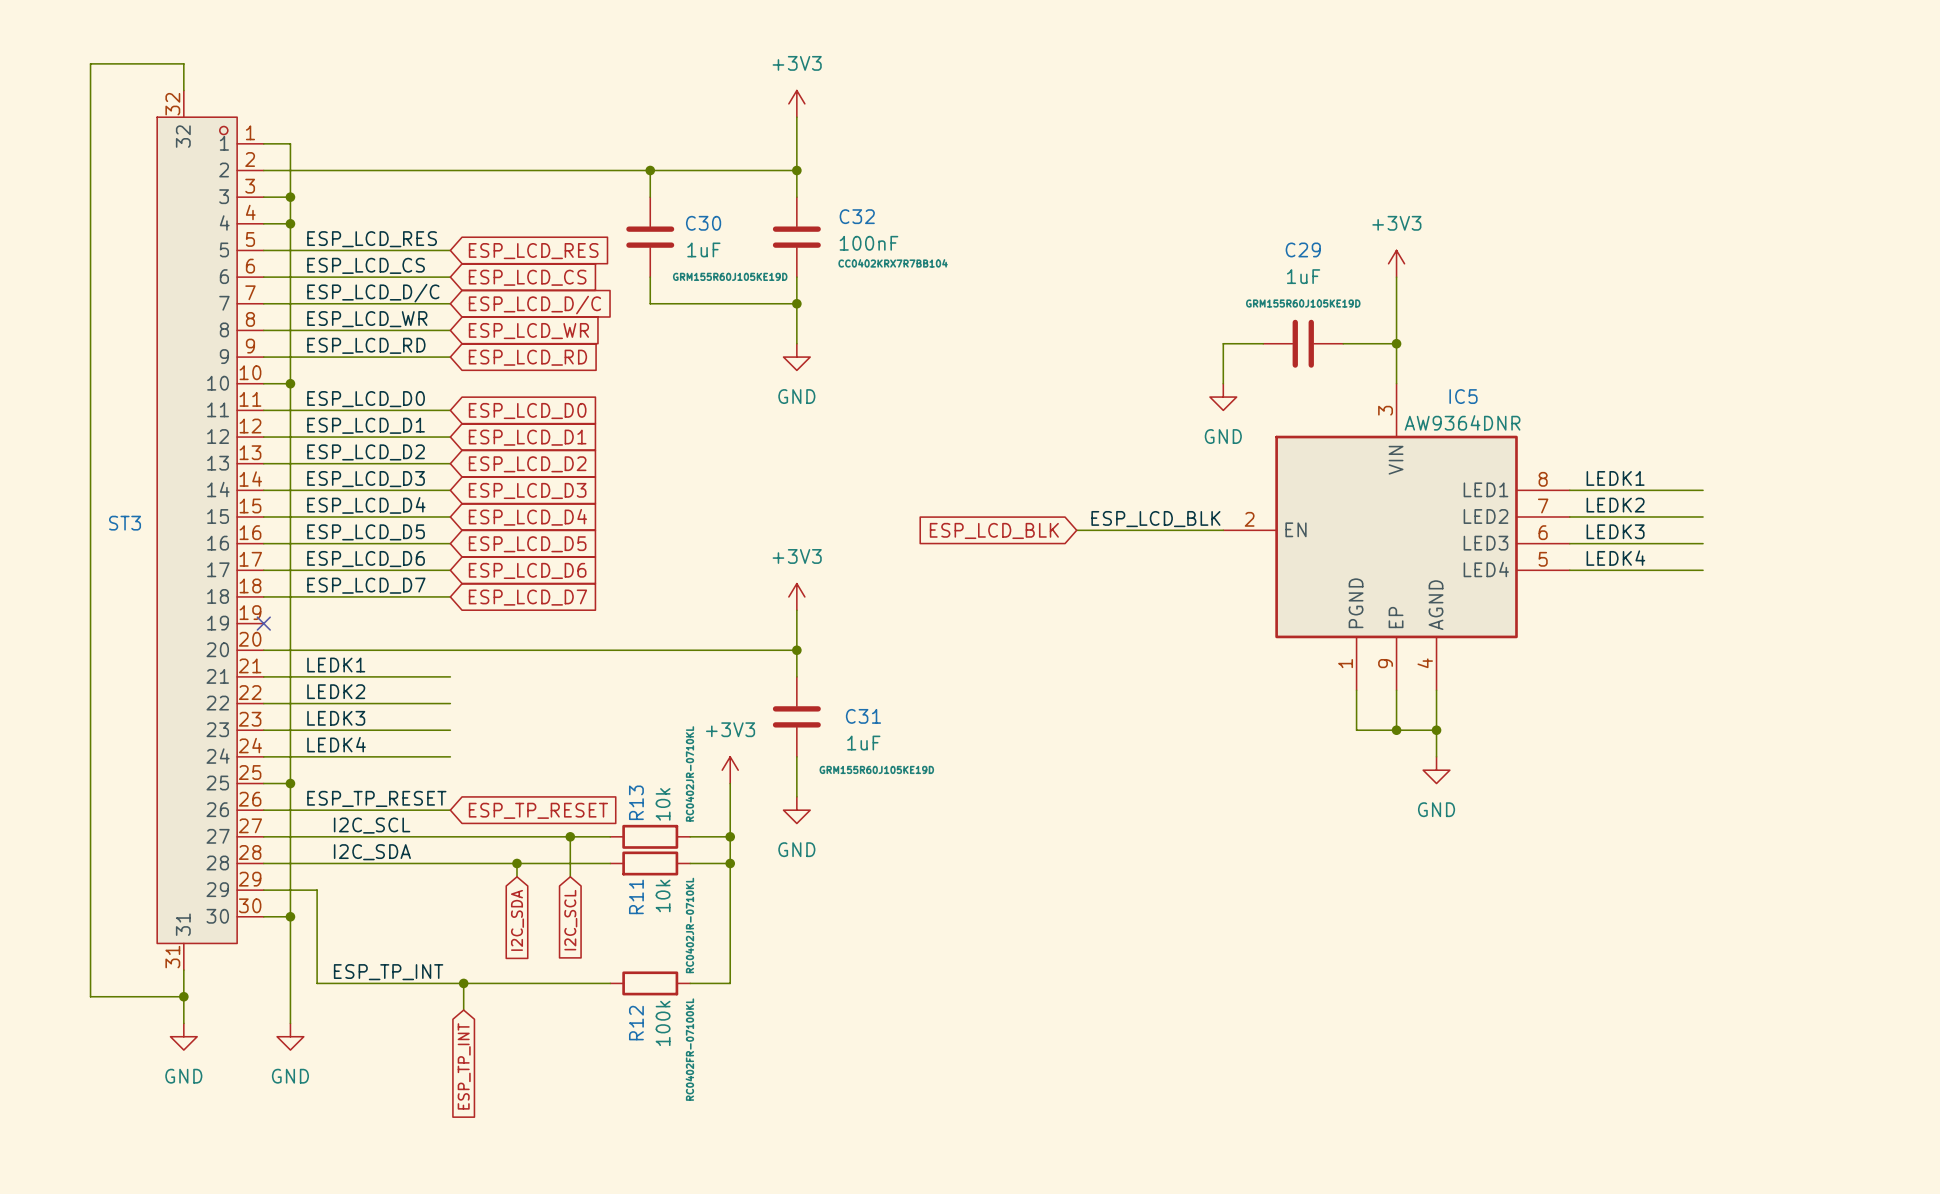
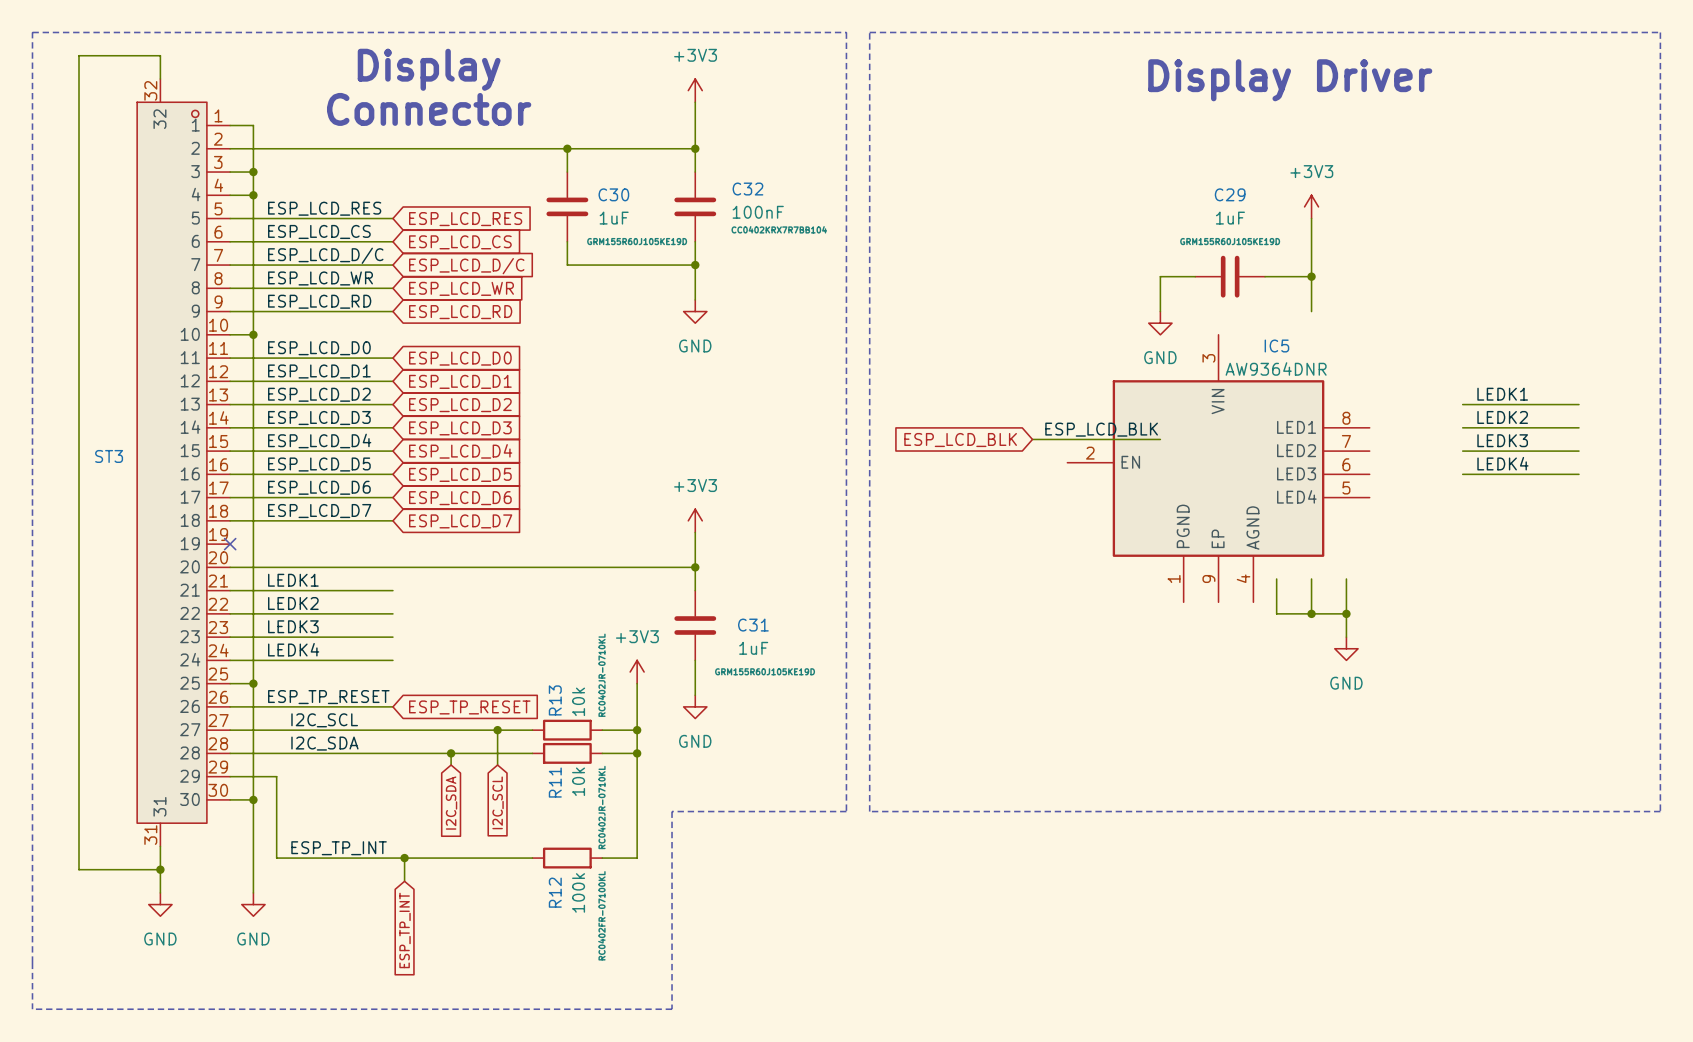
line: none -> (32, 32) (846, 32) (846, 811) (672, 811) (672, 1009) (32, 1009) (32, 32)
line: none -> (869, 32) (1660, 32) (1660, 811) (869, 811) (869, 32)
text: none -> Display (429, 69)
text: none -> Display Driver (1290, 80)
text: none -> Connector (429, 109)
power symbol position: +3V3 (1396, 263) -> +3V3 (1311, 206)
wire: (1396, 277) (1396, 383) -> (1311, 218) (1311, 311)
junction: none -> (1311, 276)
wire: (1263, 343) (1223, 343) (1223, 383) -> (1195, 276) (1160, 276) (1160, 311)
C29 position: (1303, 343) -> (1230, 276)
wire: (1343, 343) (1396, 343) -> (1265, 276) (1311, 276)
junction: (1396, 343) -> none
power symbol position: GND (1223, 397) -> GND (1160, 323)
label position: LEDK1 (1615, 478) -> LEDK1 (1502, 394)
wire: (1569, 490) (1676, 490) -> (1485, 427) (1578, 427)
label position: LEDK2 (1615, 505) -> LEDK2 (1502, 417)
wire: (1569, 516) (1676, 516) -> (1485, 451) (1578, 451)
label position: ESP_LCD_BLK (1155, 519) -> ESP_LCD_BLK (1101, 429)
global label position: ESP_LCD_BLK (994, 530) -> ESP_LCD_BLK (960, 440)
wire: (1076, 530) (1223, 530) -> (1032, 439) (1160, 439)
label position: LEDK3 (1615, 531) -> LEDK3 (1502, 440)
wire: (1569, 543) (1676, 543) -> (1485, 474) (1578, 474)
label position: LEDK4 (1615, 558) -> LEDK4 (1502, 463)
wire: (1569, 570) (1703, 570) -> (1462, 404) (1578, 404)
wire: (1356, 690) (1356, 730) (1436, 730) -> (1276, 578) (1276, 613) (1346, 613)
wire: (1396, 690) (1396, 730) -> (1311, 578) (1311, 613)
wire: (1436, 690) (1436, 756) -> (1346, 578) (1346, 637)
junction: none -> (1311, 613)
junction: none -> (1346, 613)
junction: (1396, 730) -> none
junction: (1436, 730) -> none
power symbol position: GND (1436, 770) -> GND (1346, 648)

